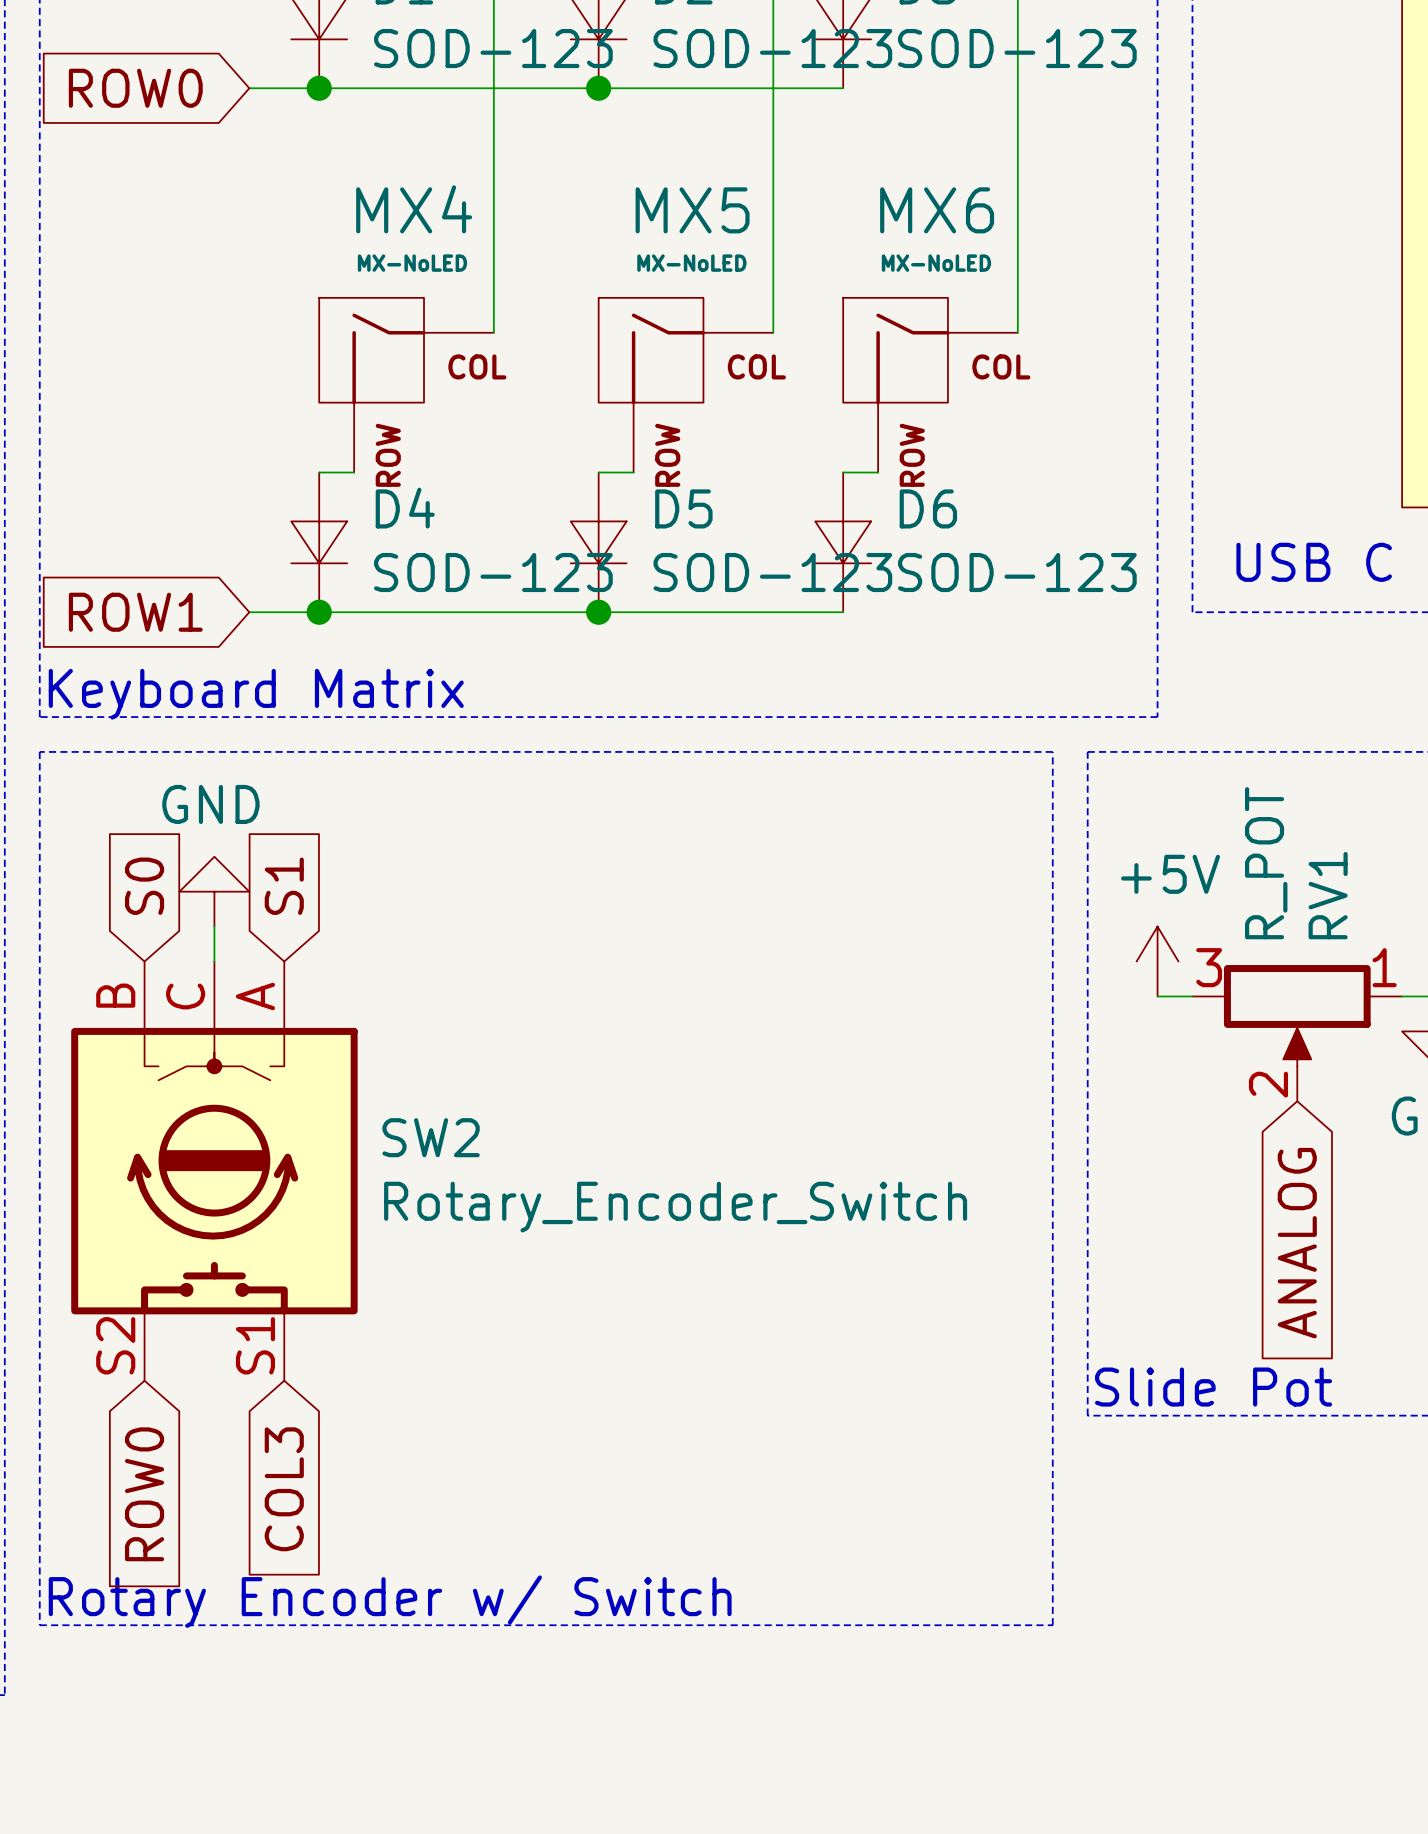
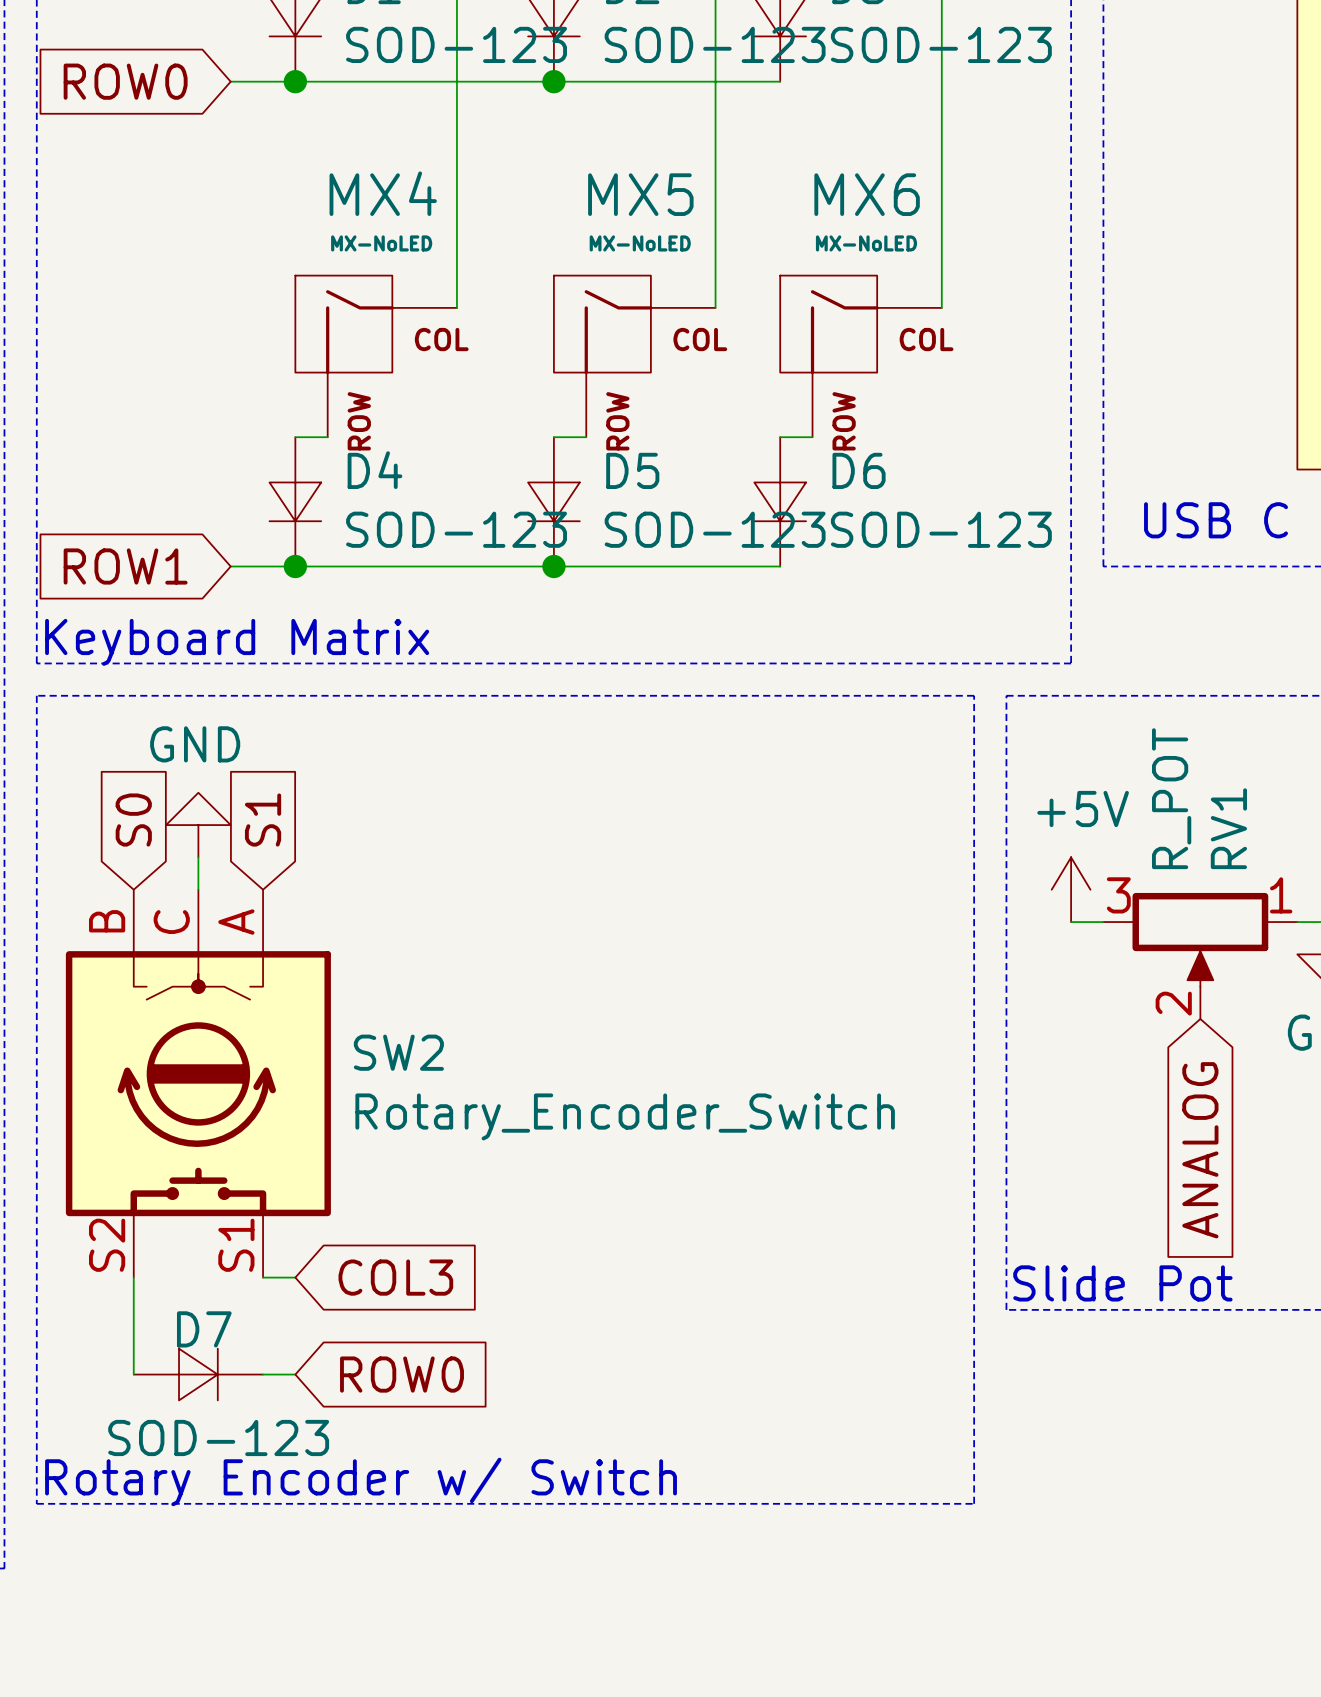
wire: none -> (133, 1277) (133, 1374)
wire: none -> (263, 1277) (295, 1277)
D7: none -> SOD-123 (198, 1374)
wire: none -> (263, 1374) (295, 1374)
global label rotation: 0° (284, 1489) -> 90° counterclockwise (395, 1277)
global label rotation: 0° (144, 1494) -> 90° counterclockwise (402, 1374)
global label position: ROW0 (144, 1494) -> ROW0 (402, 1374)

